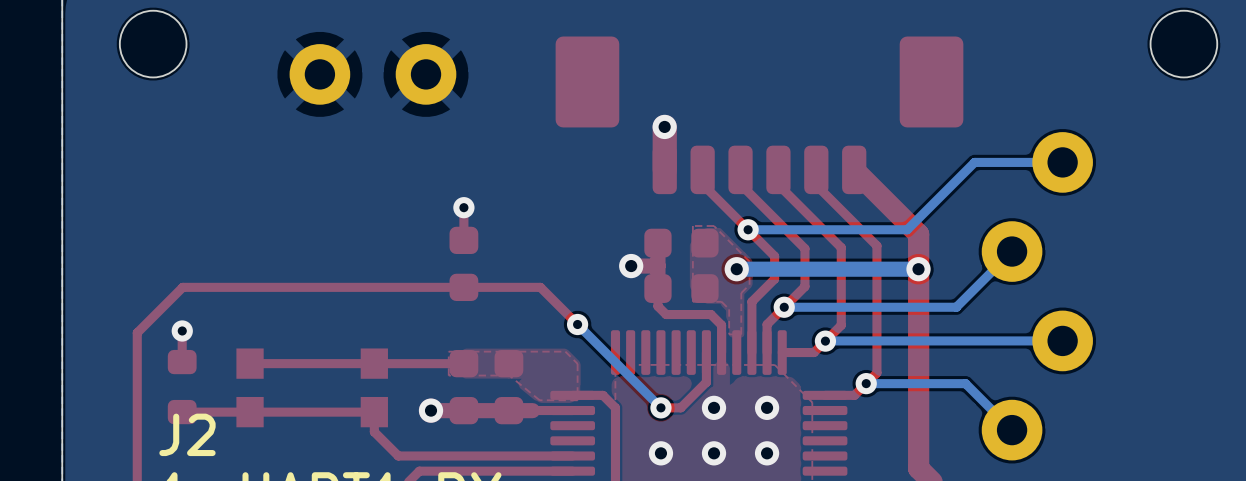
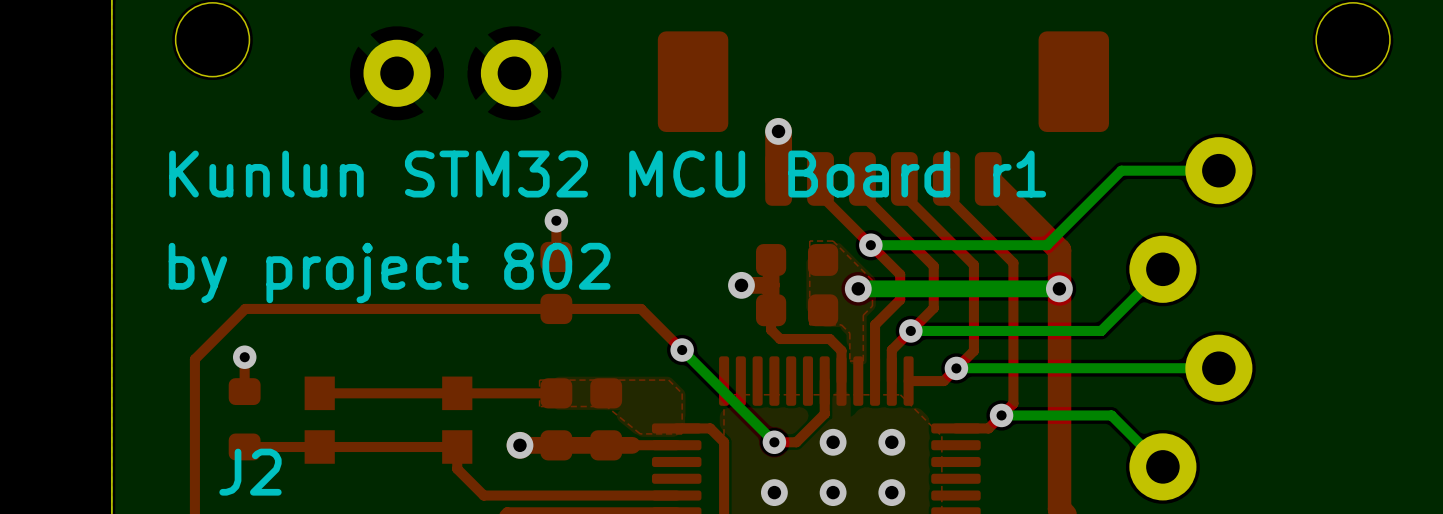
text: none -> Kunlun STM32 MCU Board r1 (607, 174)
text: none -> by project 802 (389, 272)

